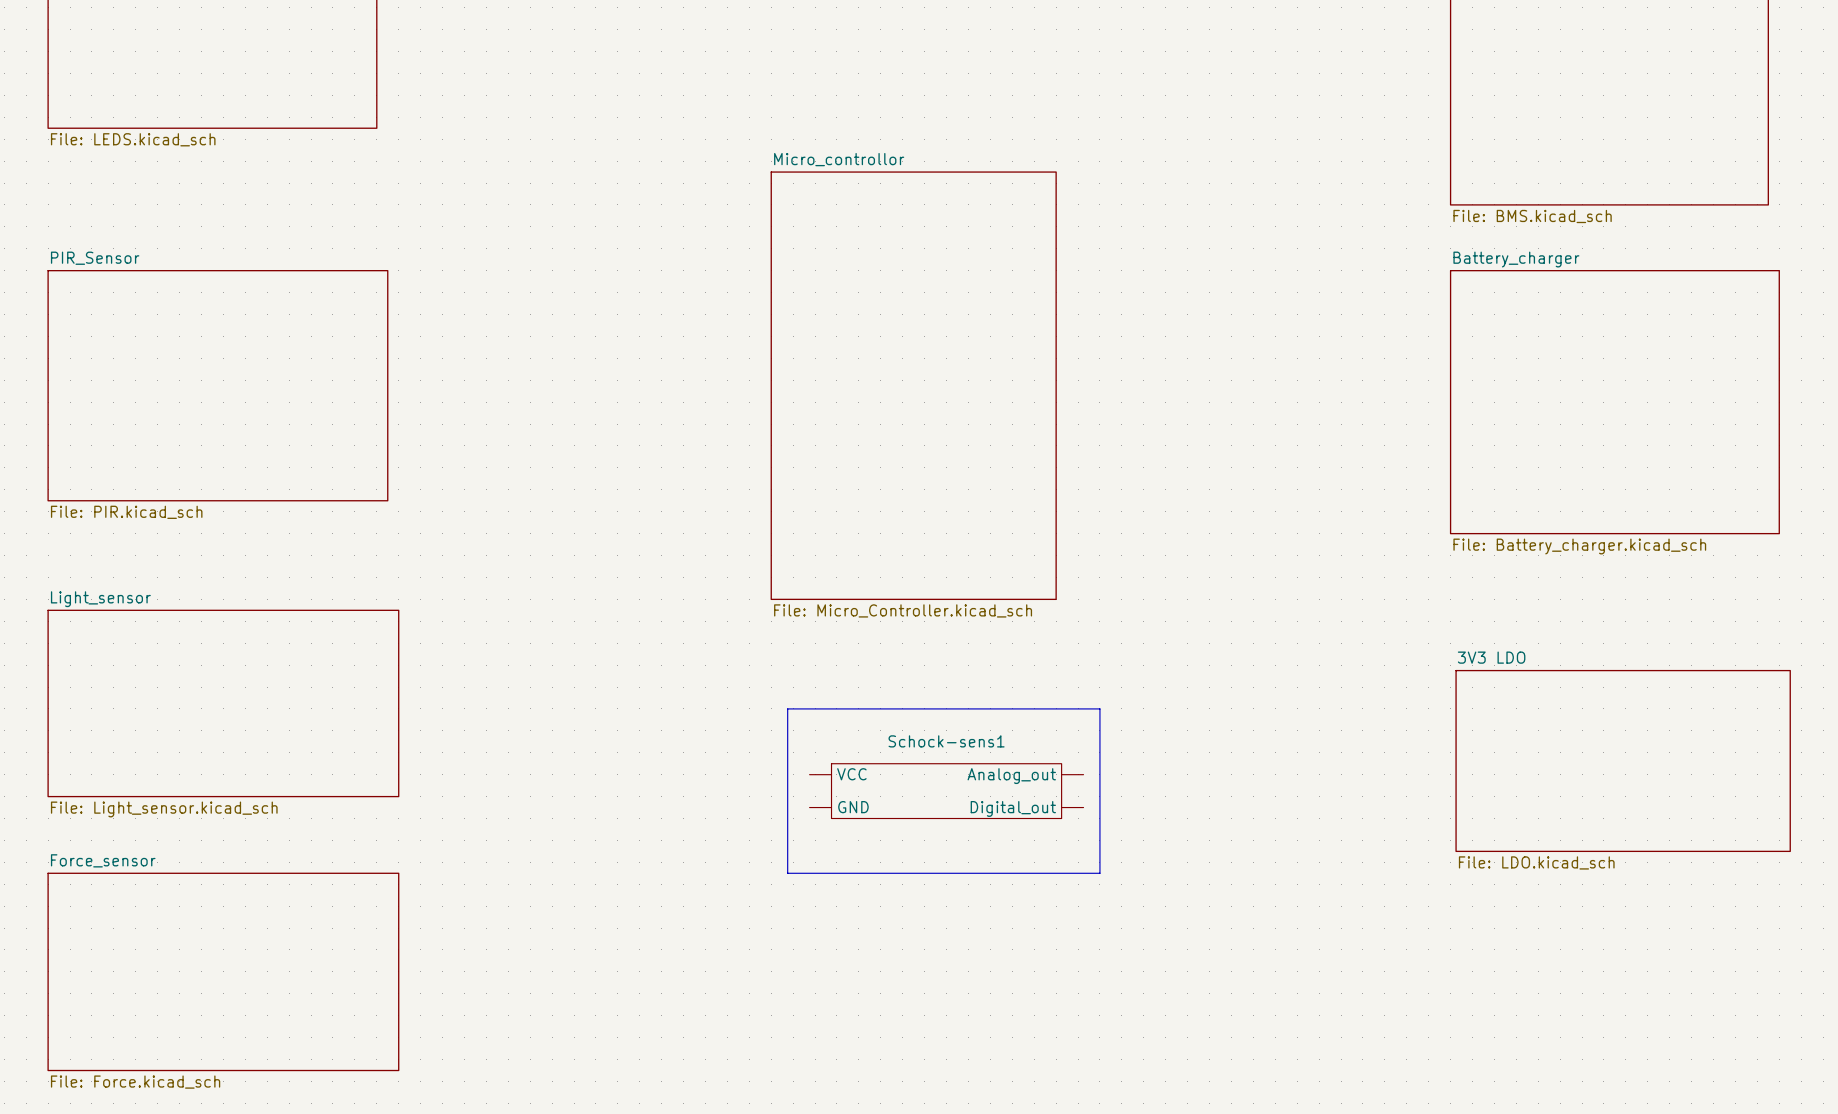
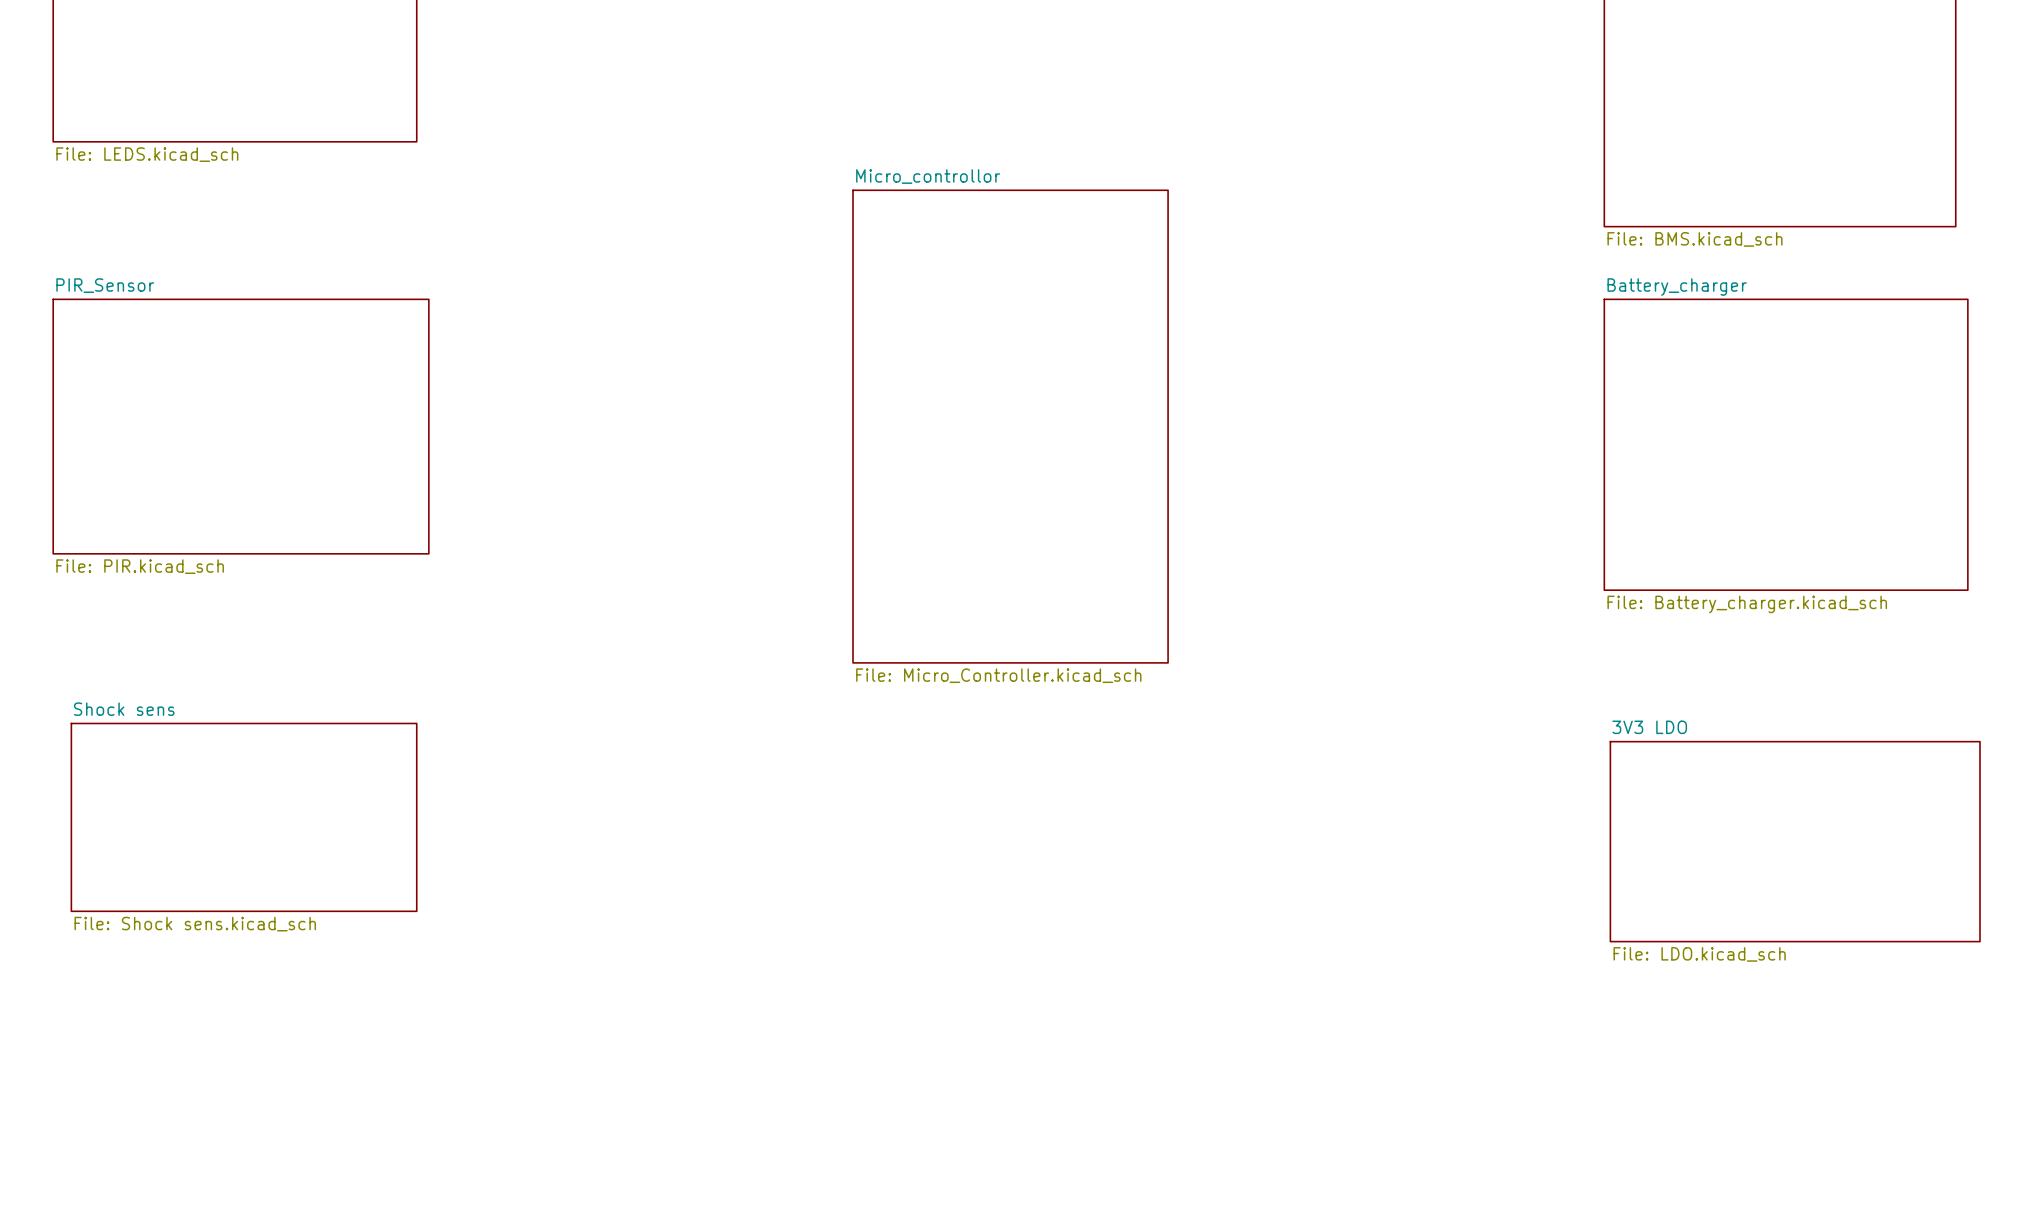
sheet Light_sensor: File: Light_sensor.kicad_sch (223, 703) -> none
line: (787, 708) (1099, 708) (1099, 873) (787, 873) (787, 708) -> none
sheet Shock sens: none -> File: Shock sens.kicad_sch (244, 817)
Schock-sens1: (946, 791) -> none
sheet Force_sensor: File: Force.kicad_sch (223, 971) -> none

